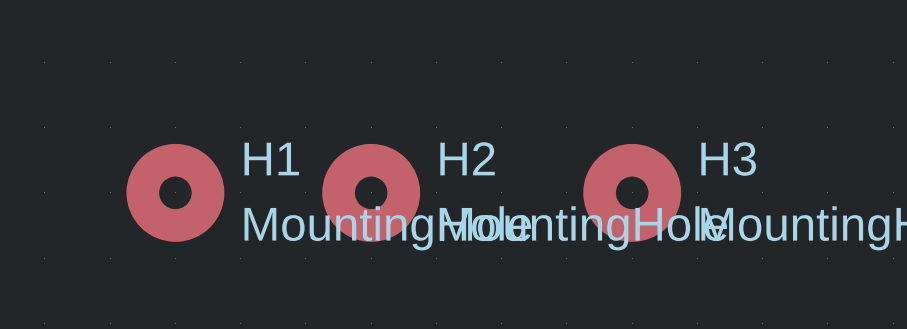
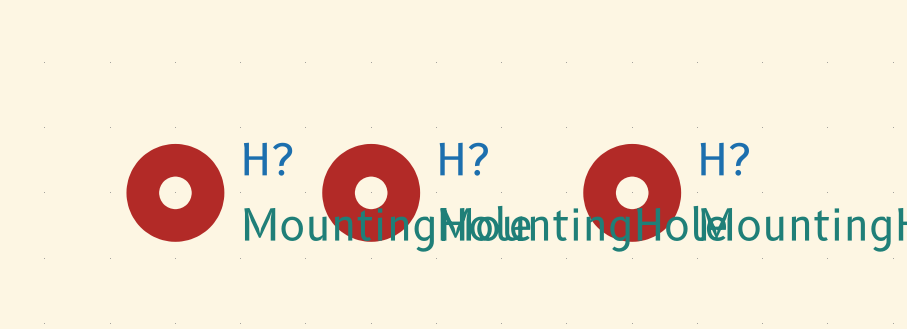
H2 name: H2 (467, 158) -> H? (463, 159)
H1 name: H1 (271, 159) -> H? (268, 159)
H3 name: H3 (728, 159) -> H? (724, 159)

